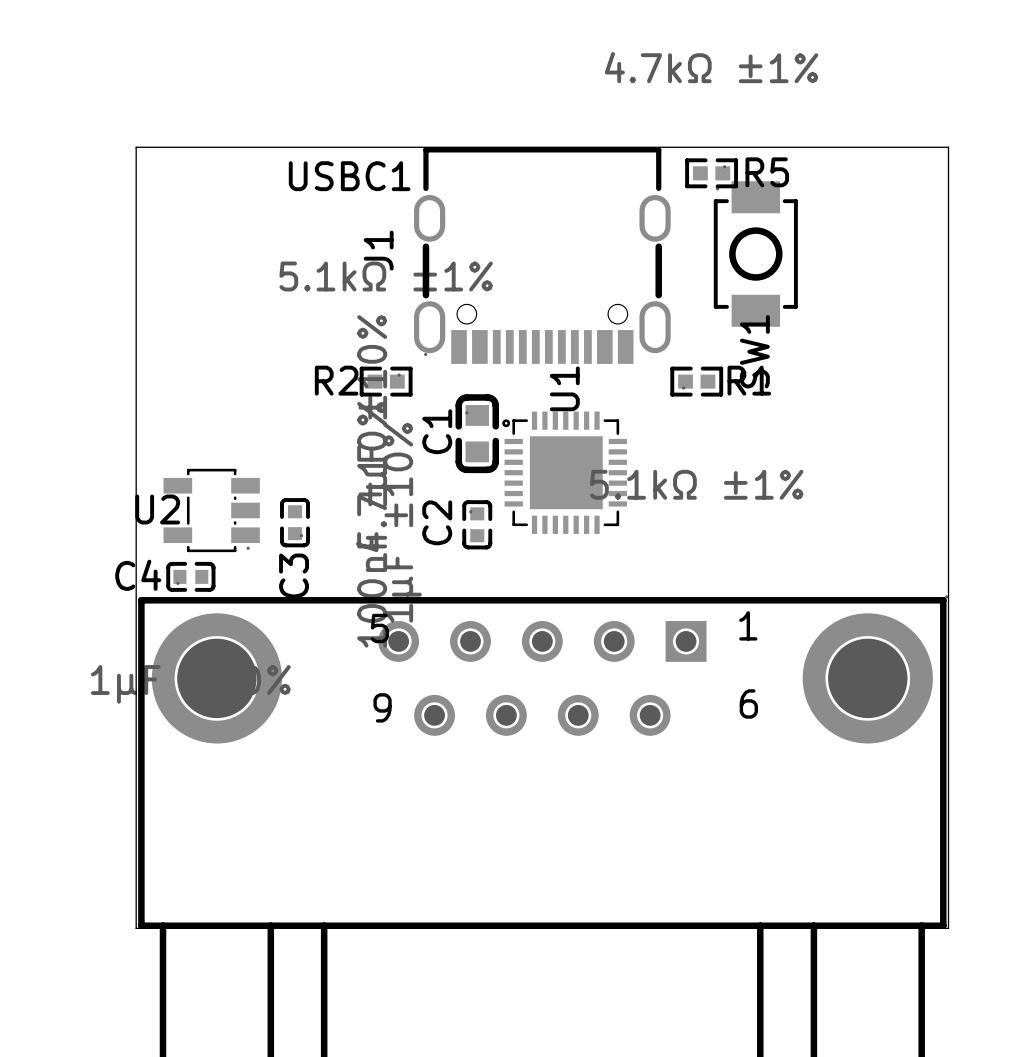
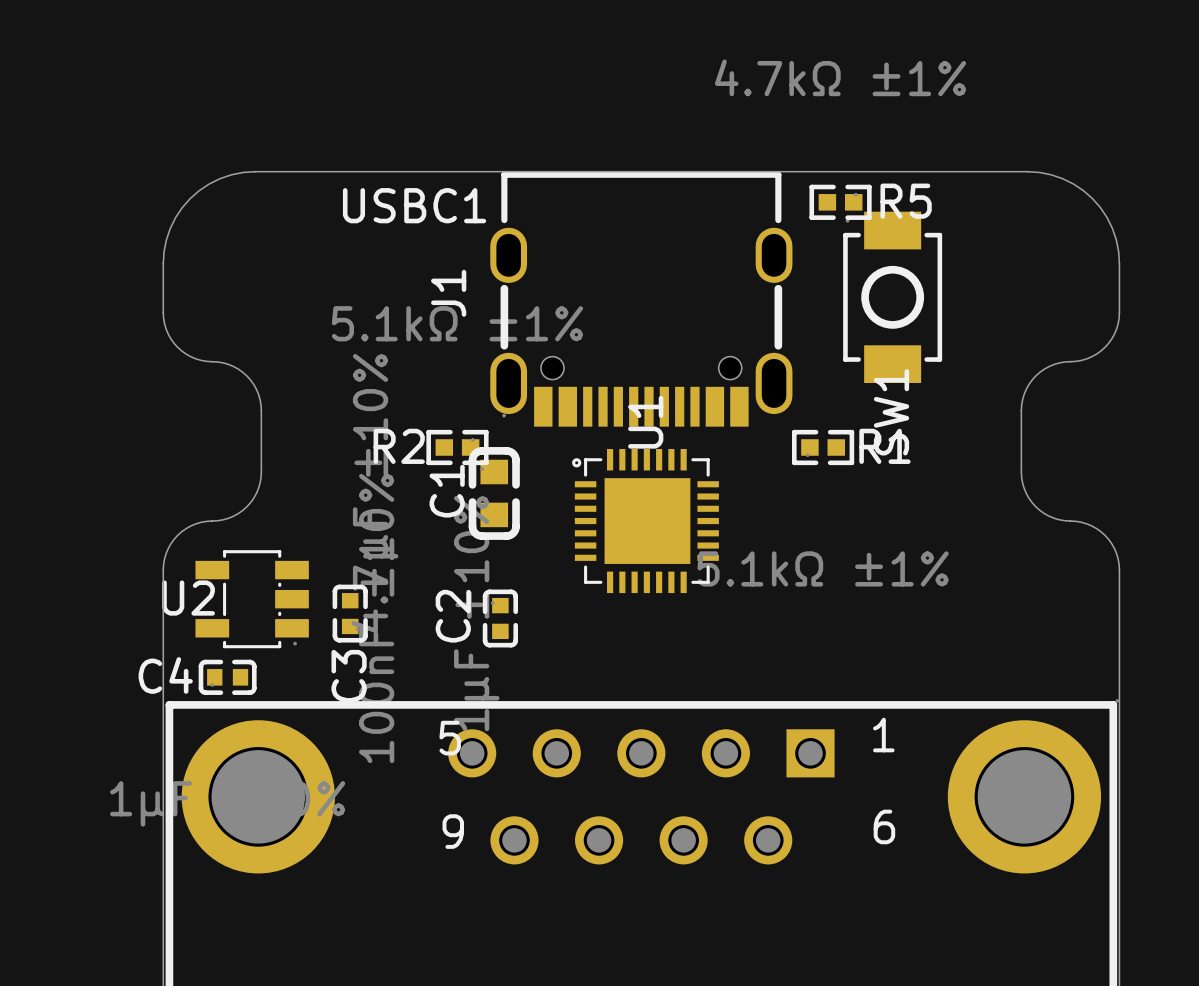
board edge: (214, 147) (136, 147) (136, 225) -> (255, 171) (243, 172) (220, 178) (209, 183) (190, 198) (175, 217) (170, 228) (164, 251) (163, 263)
board edge: (870, 147) (948, 147) (948, 225) -> (1027, 171) (1039, 172) (1062, 178) (1083, 190) (1092, 198) (1107, 217) (1112, 228) (1116, 239) (1119, 263)
board edge: (136, 267) (136, 485) -> (163, 312) (168, 333) (177, 347) (196, 358) (223, 362) (242, 372) (256, 389) (261, 410) (261, 477) (253, 498) (246, 506) (233, 516) (196, 523) (181, 531) (168, 548) (163, 570)
board edge: (948, 267) (948, 485) -> (1119, 312) (1114, 333) (1100, 350) (1081, 360) (1054, 364) (1035, 376) (1026, 389) (1021, 410) (1021, 477) (1028, 498) (1039, 510) (1049, 516) (1086, 523) (1100, 531) (1114, 548) (1119, 570)
C1 position: (477, 433) -> (494, 493)
U1 position: (564, 472) -> (645, 521)
C2 position: (477, 524) -> (500, 618)

